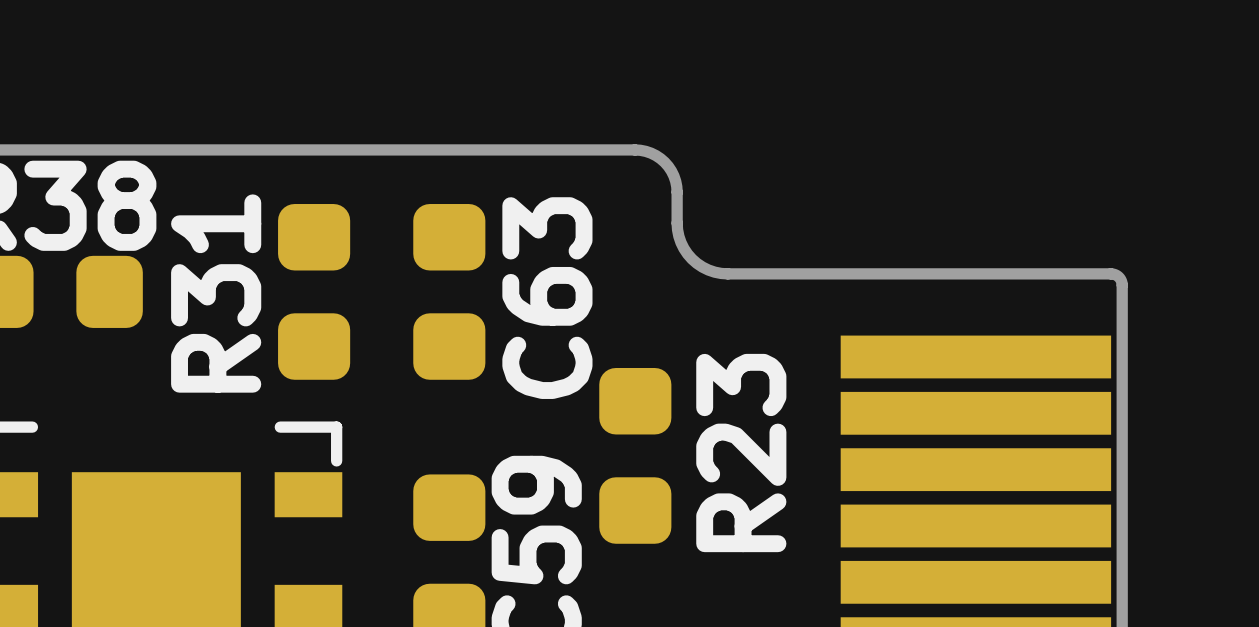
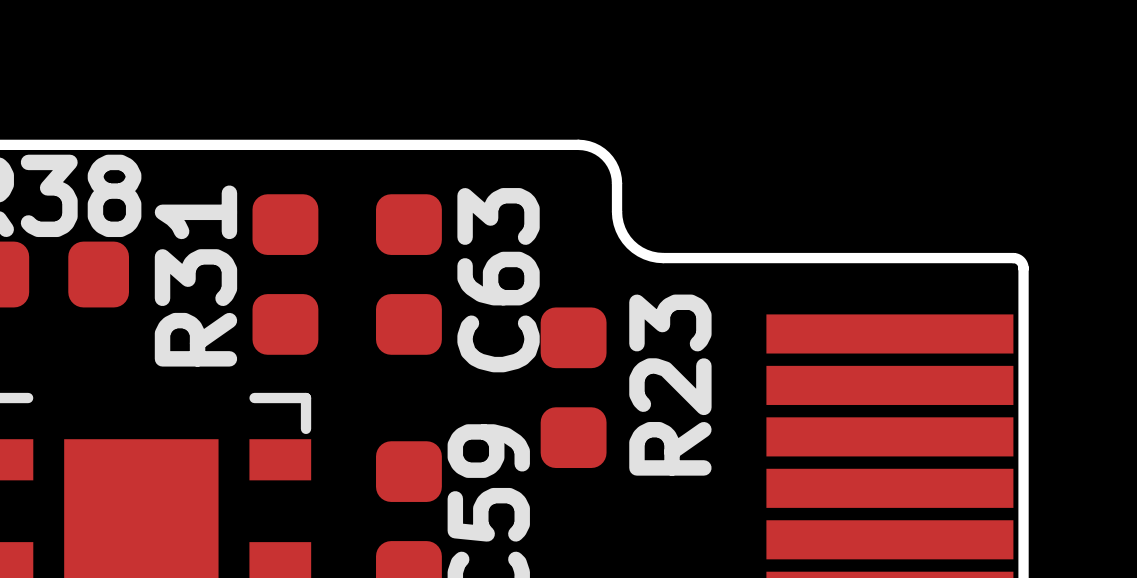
R23 position: (635, 455) -> (573, 387)

